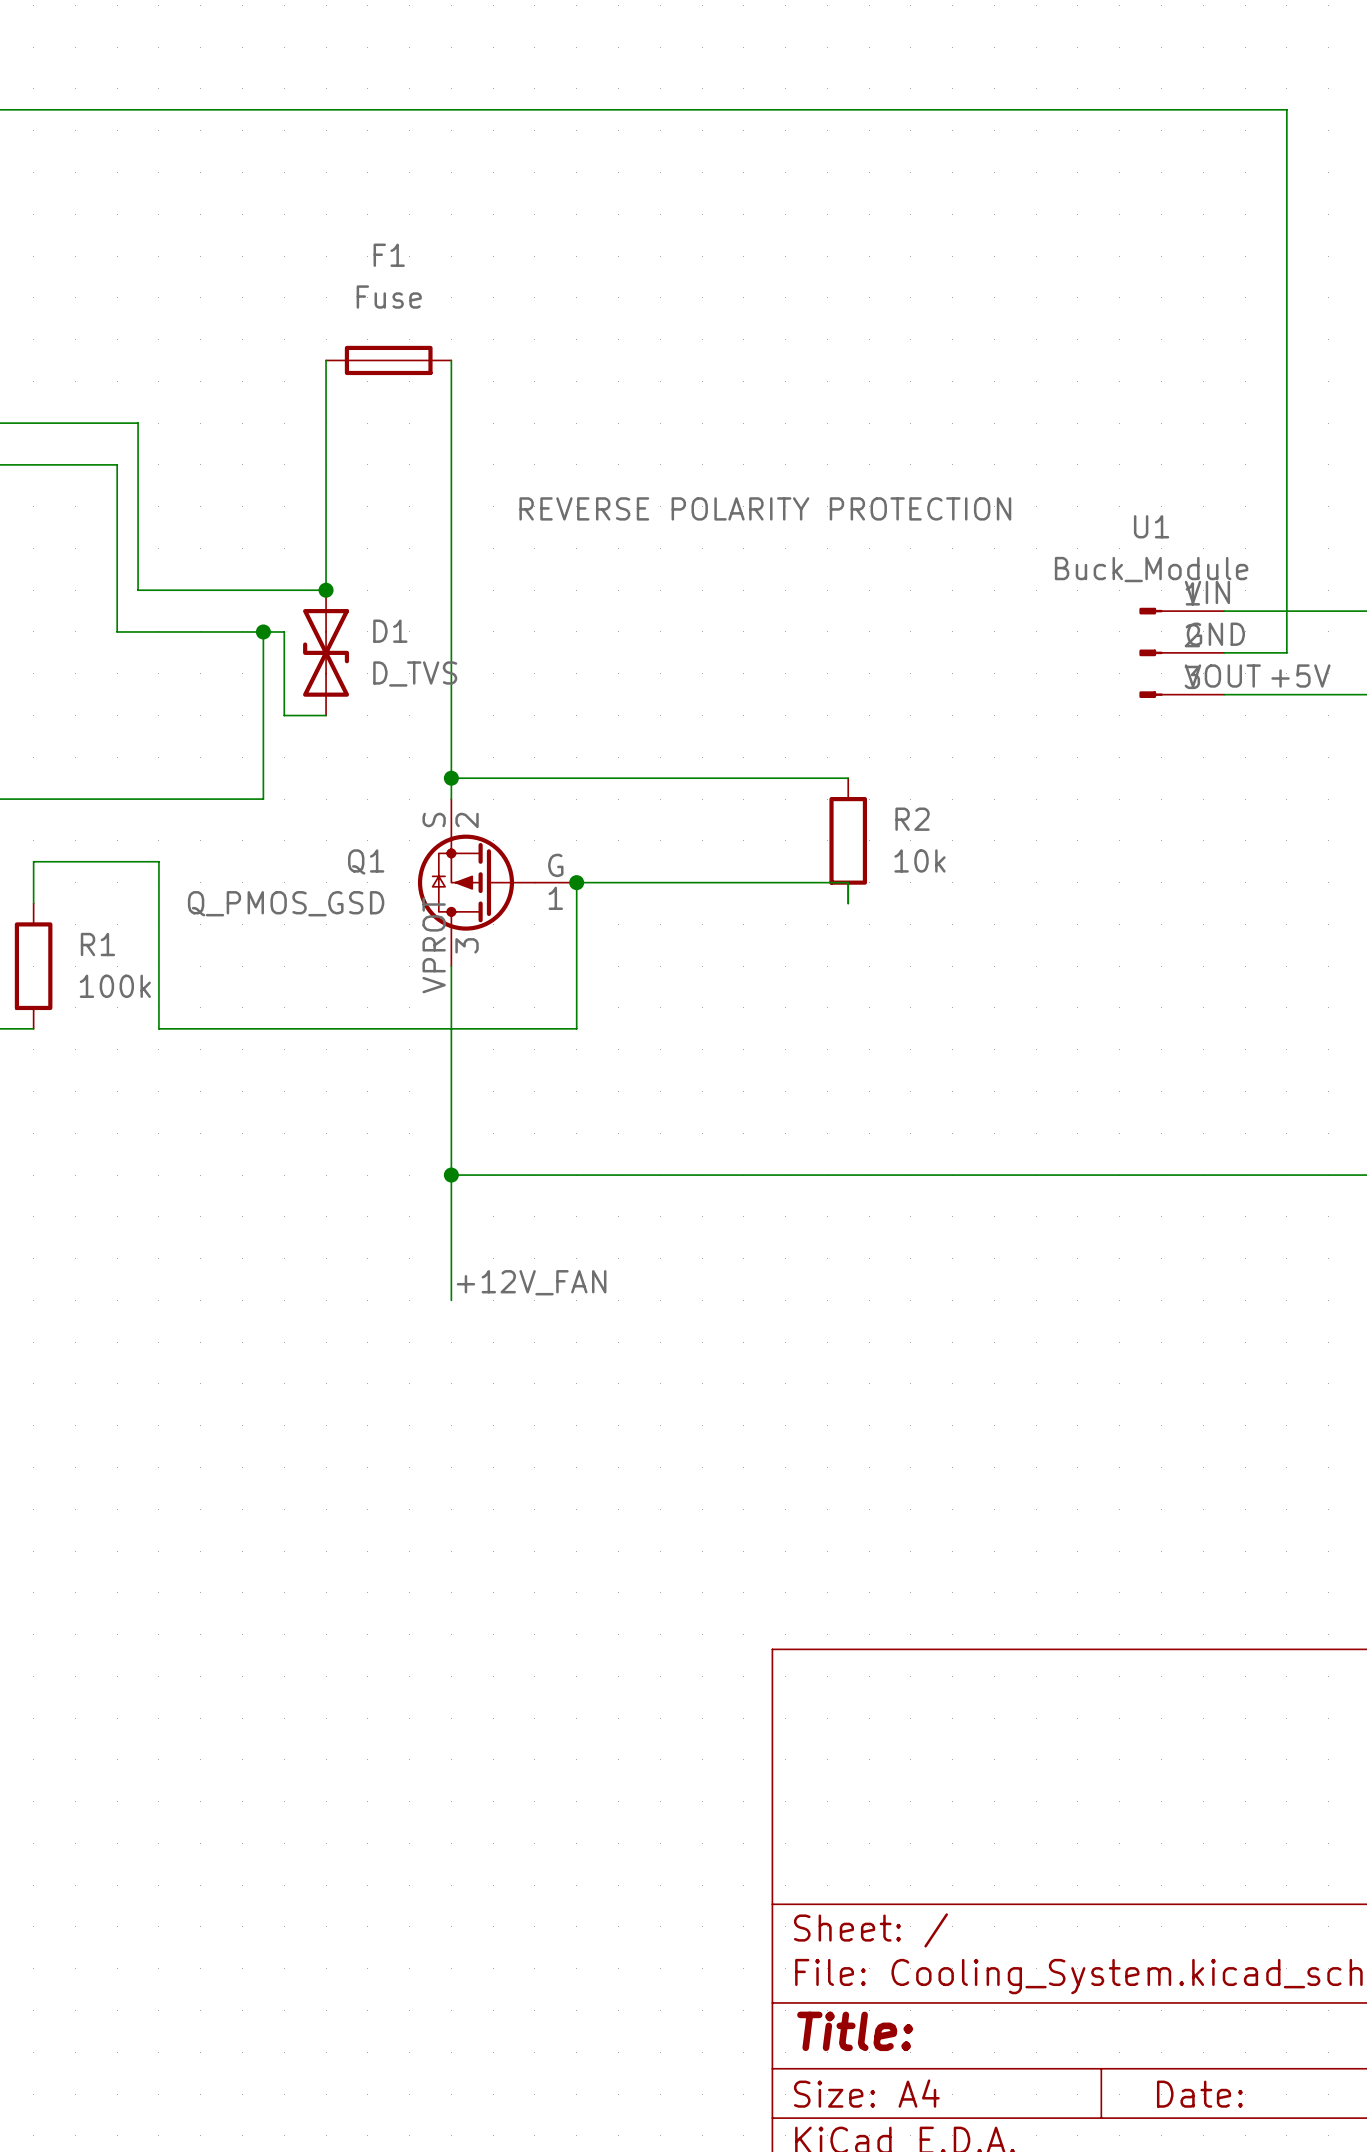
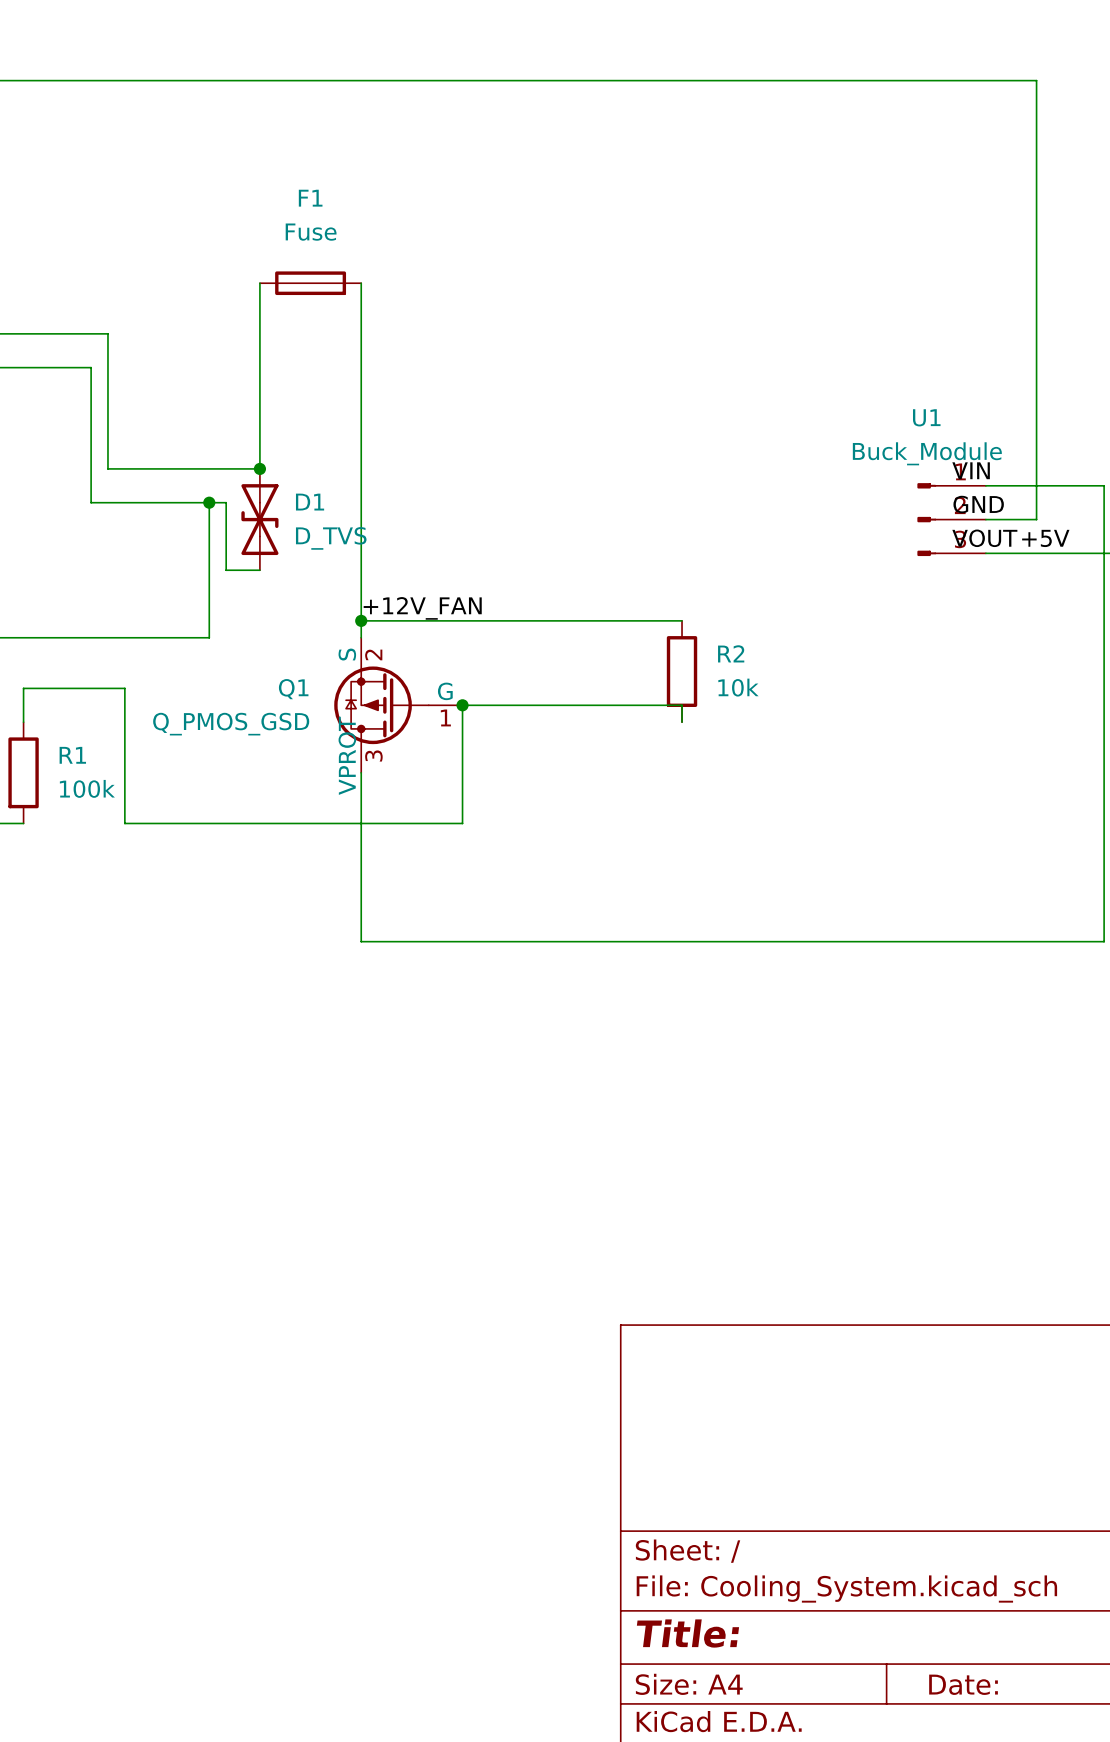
label: REVERSE POLARITY PROTECTION (765, 508) -> none
label: none -> +12V_FAN (422, 608)
wire: (451, 1175) (451, 1300) -> none
junction: (451, 1175) -> none
label: +12V_FAN (531, 1282) -> none

